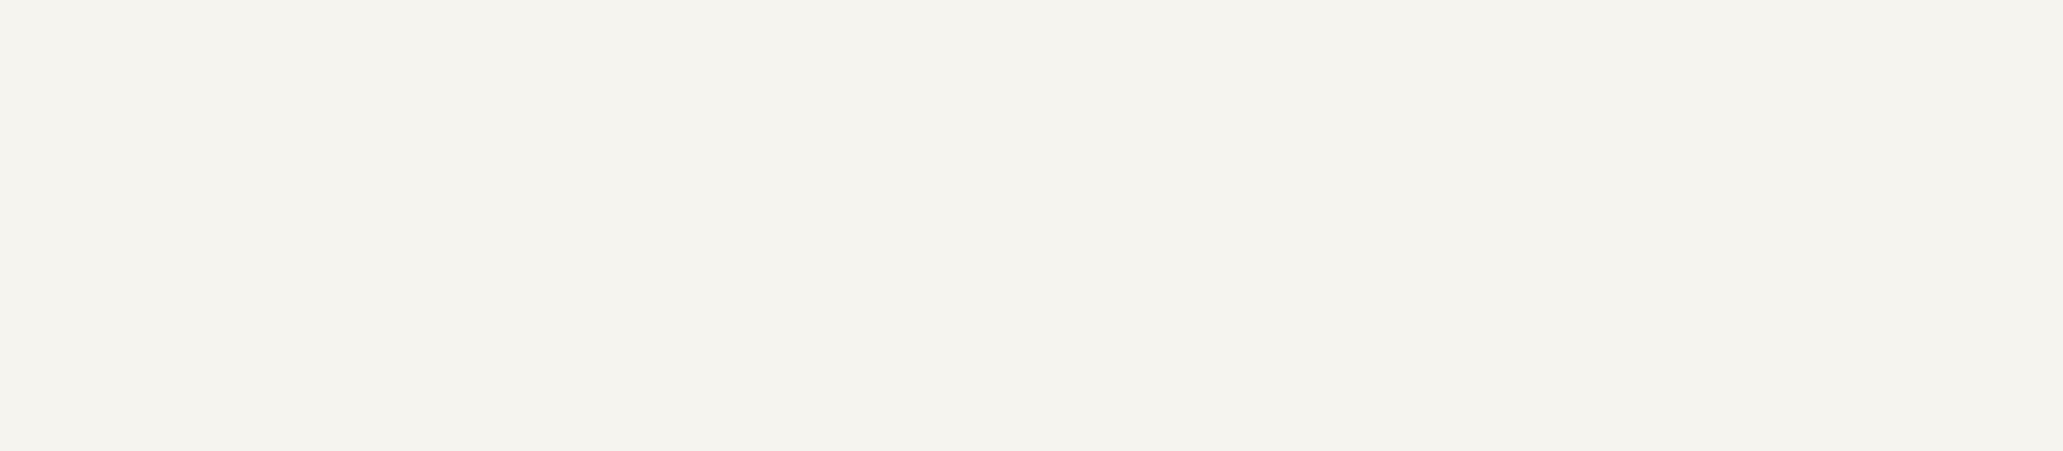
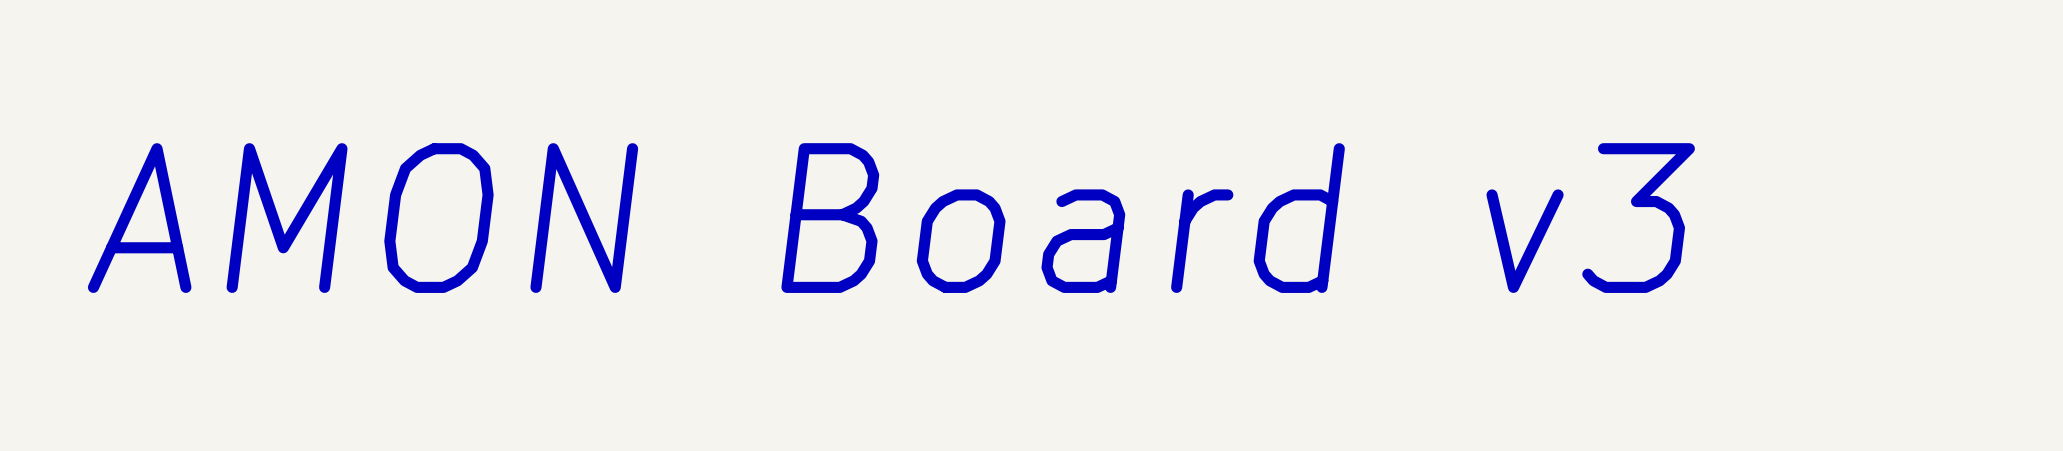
text: none -> AMON Board v3 (891, 218)

